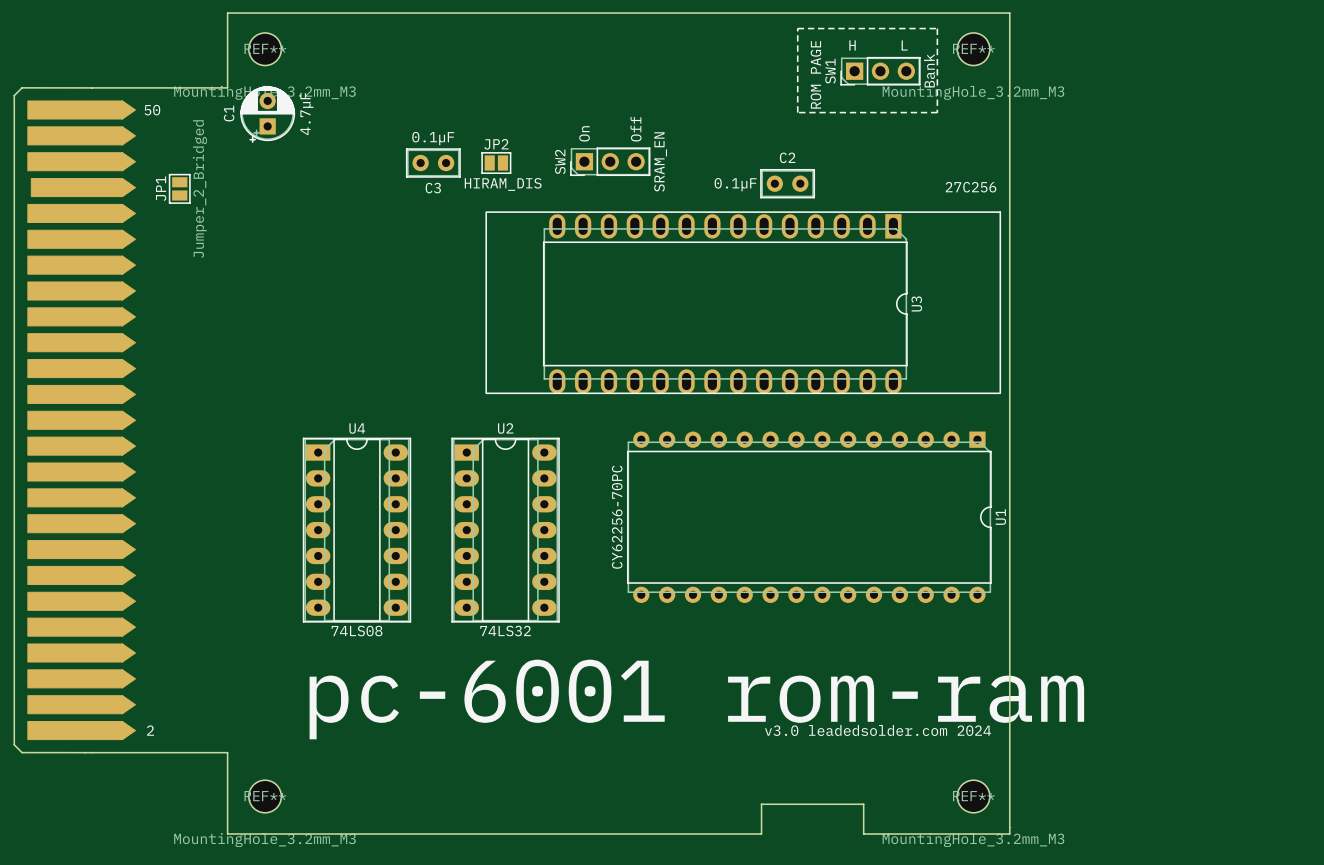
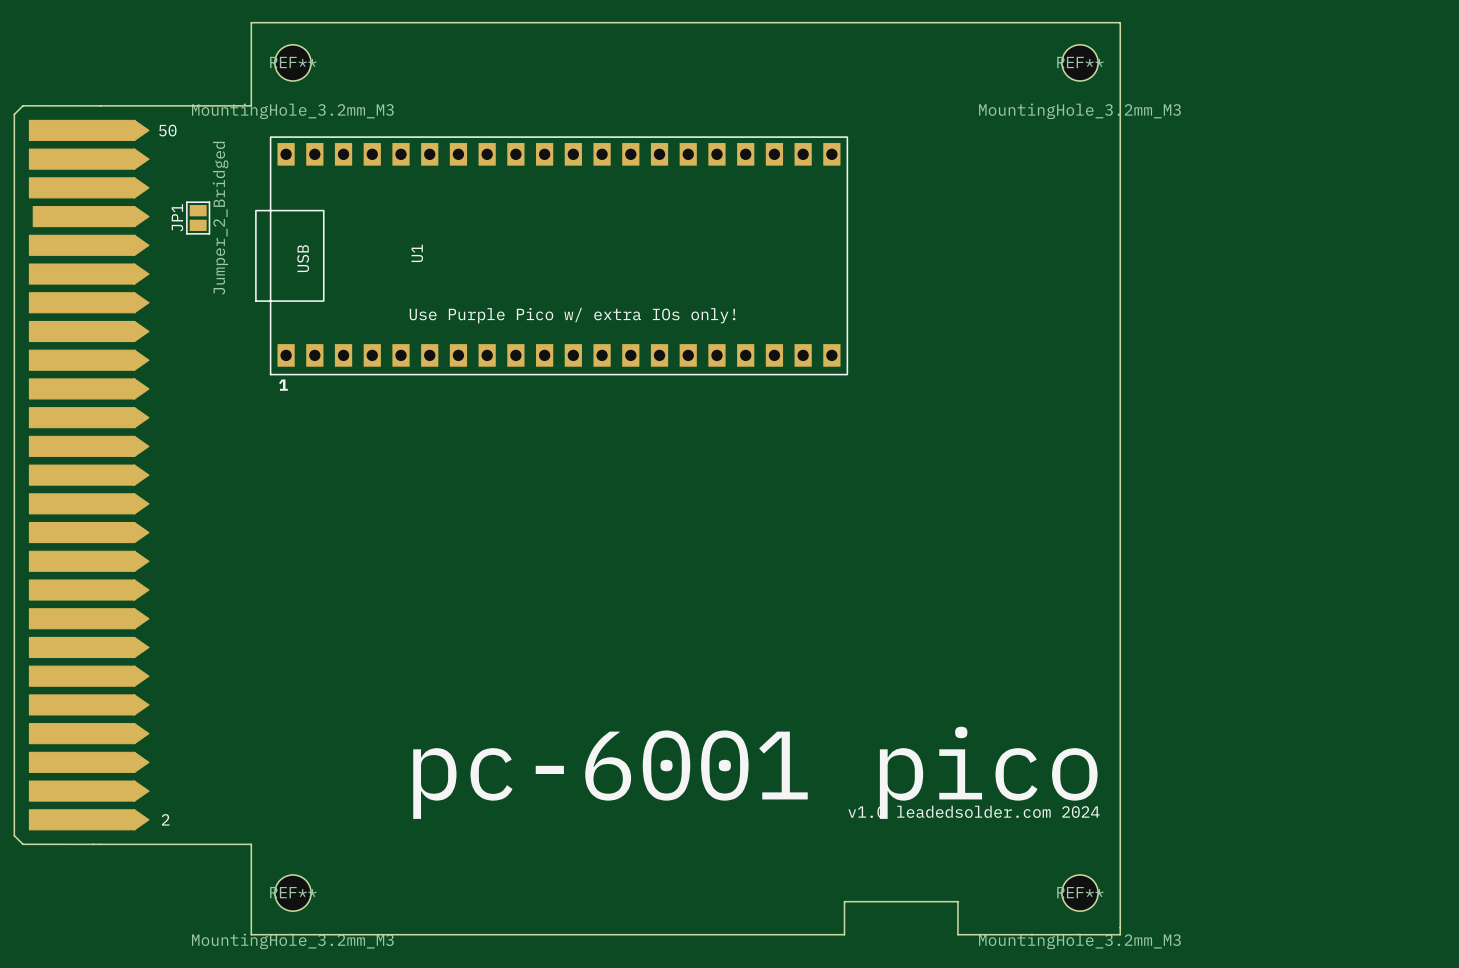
line: (797, 28) (937, 28) (937, 112) (797, 112) (797, 28) -> none
text: H (852, 45) -> none
text: L (904, 45) -> none
SW1: Bank (880, 71) -> none
text: ROM PAGE (815, 74) -> none
C1: 4.7µF (267, 114) -> none
text: Off (636, 129) -> none
text: On (584, 133) -> none
SW2: SRAM_EN (610, 161) -> none
C3: 0.1µF (433, 163) -> none
JP2: HIRAM_DIS (496, 163) -> none
C2: 0.1µF (787, 183) -> none
U3: 27C256 (743, 302) -> none
text: none -> 1 (283, 385)
U1 footprint: [627, 431, 992, 603] -> [255, 136, 848, 376]
U1 value: CY62256-70PC (617, 517) -> none
U1 name position: U1 (1000, 517) -> U1 (417, 253)
U4: 74LS08 (356, 530) -> none
U2: 74LS32 (505, 530) -> none
text: none -> pc-6001 pico (755, 772)
text: pc-6001 rom-ram (696, 699) -> none
text: v3.0 leadedsolder.com 2024 (878, 730) -> v1.0 leadedsolder.com 2024 (973, 811)

